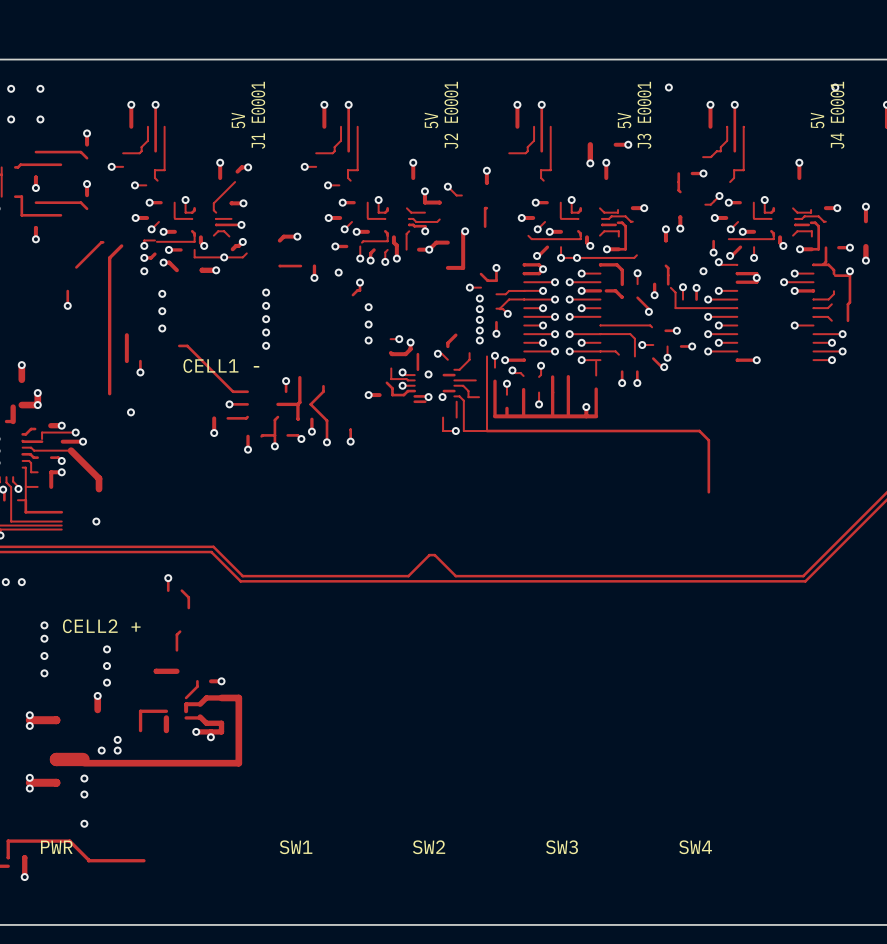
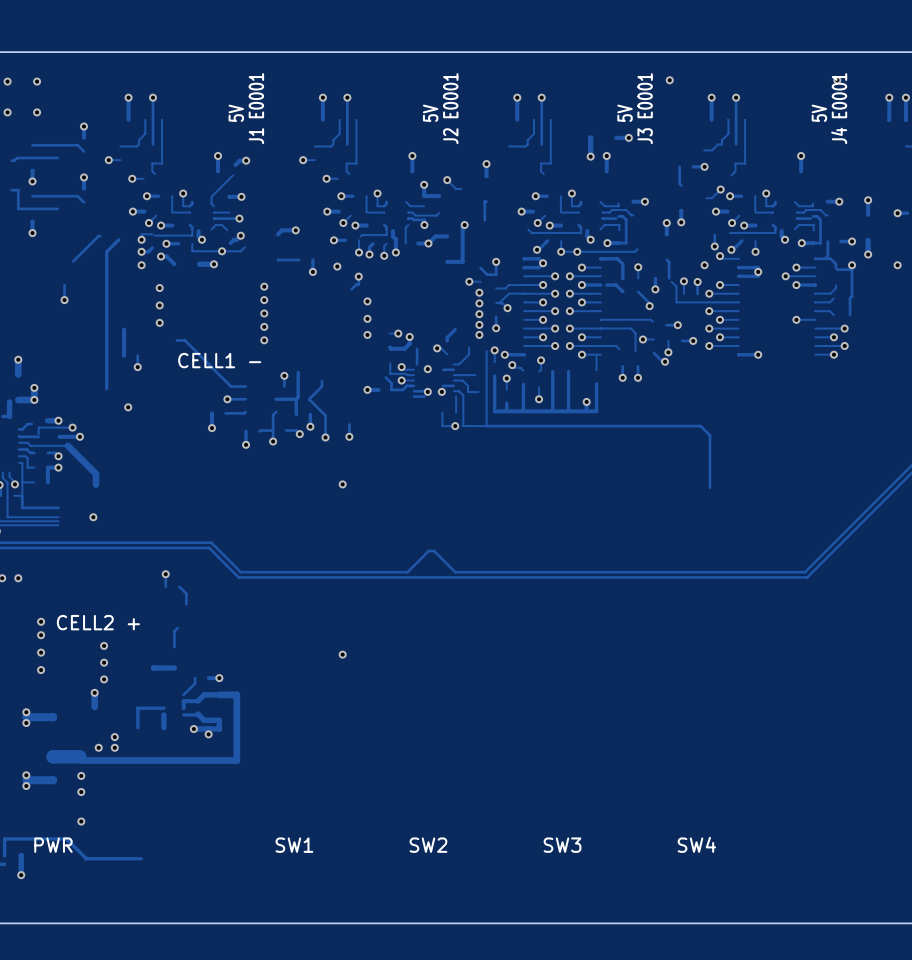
via: none -> (342, 484)
via: none -> (342, 654)

